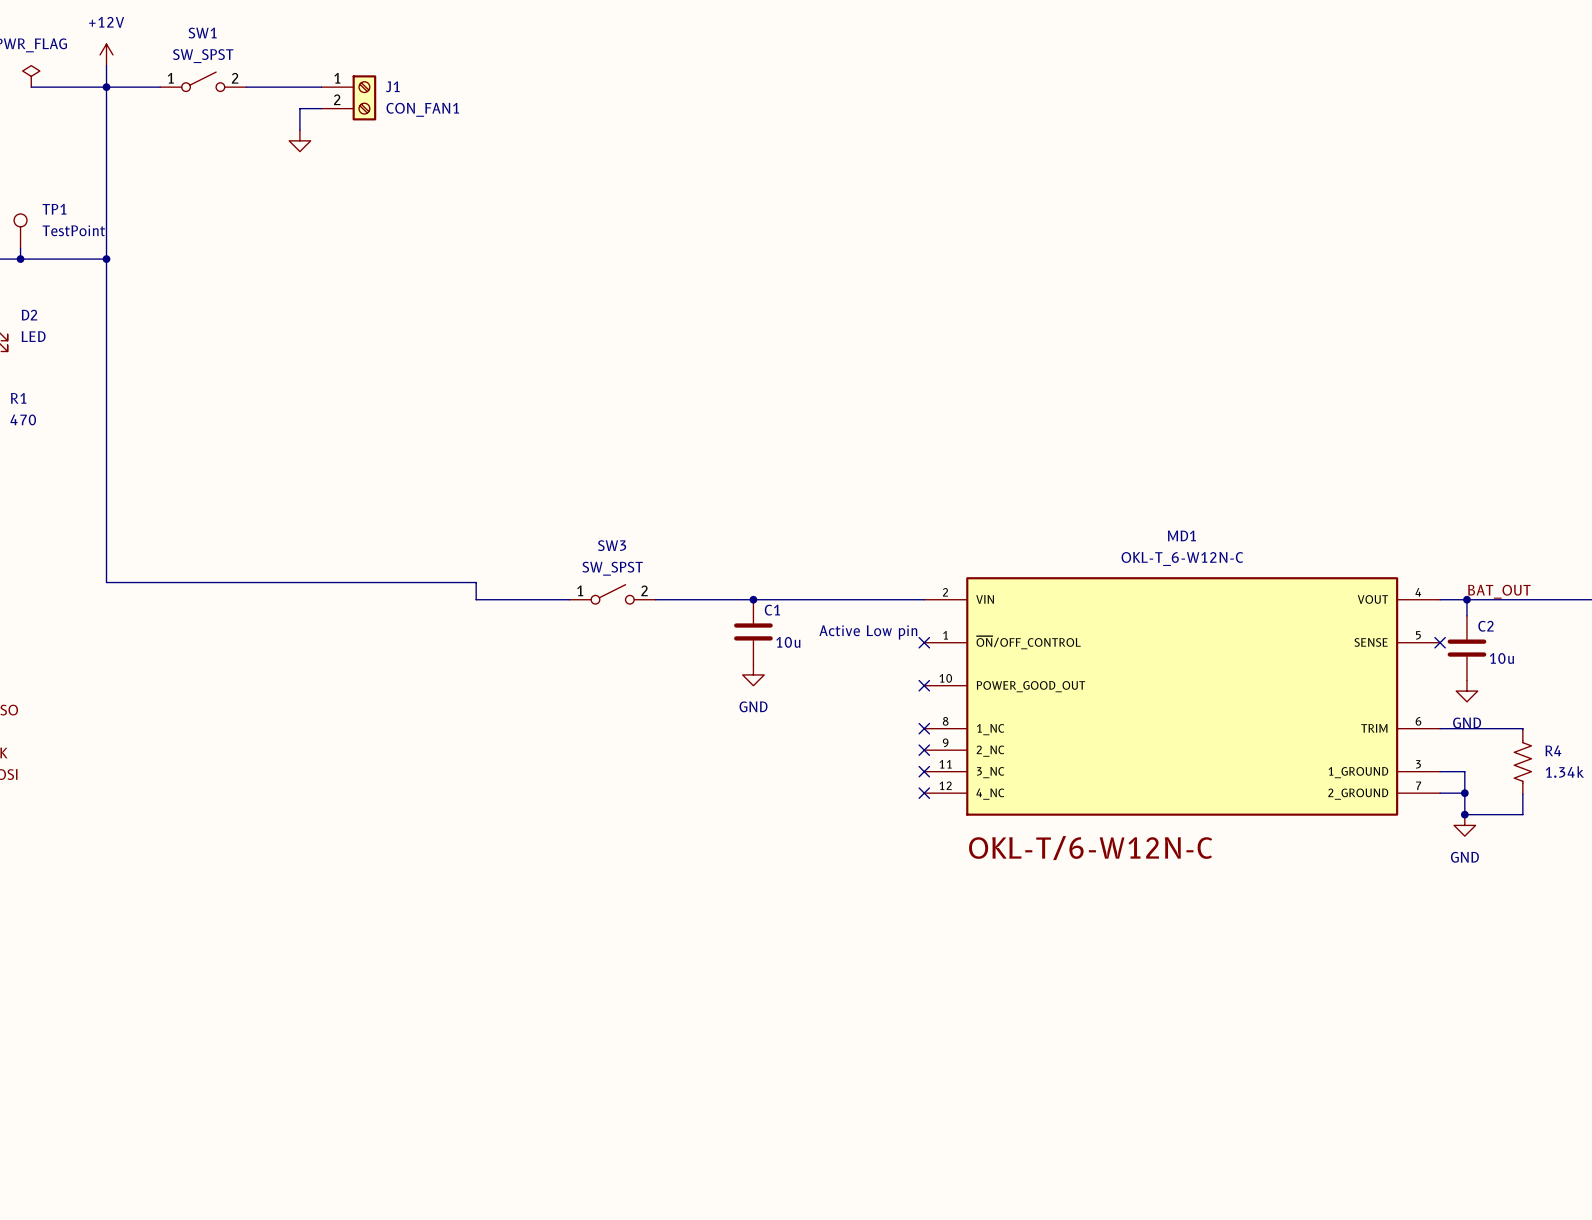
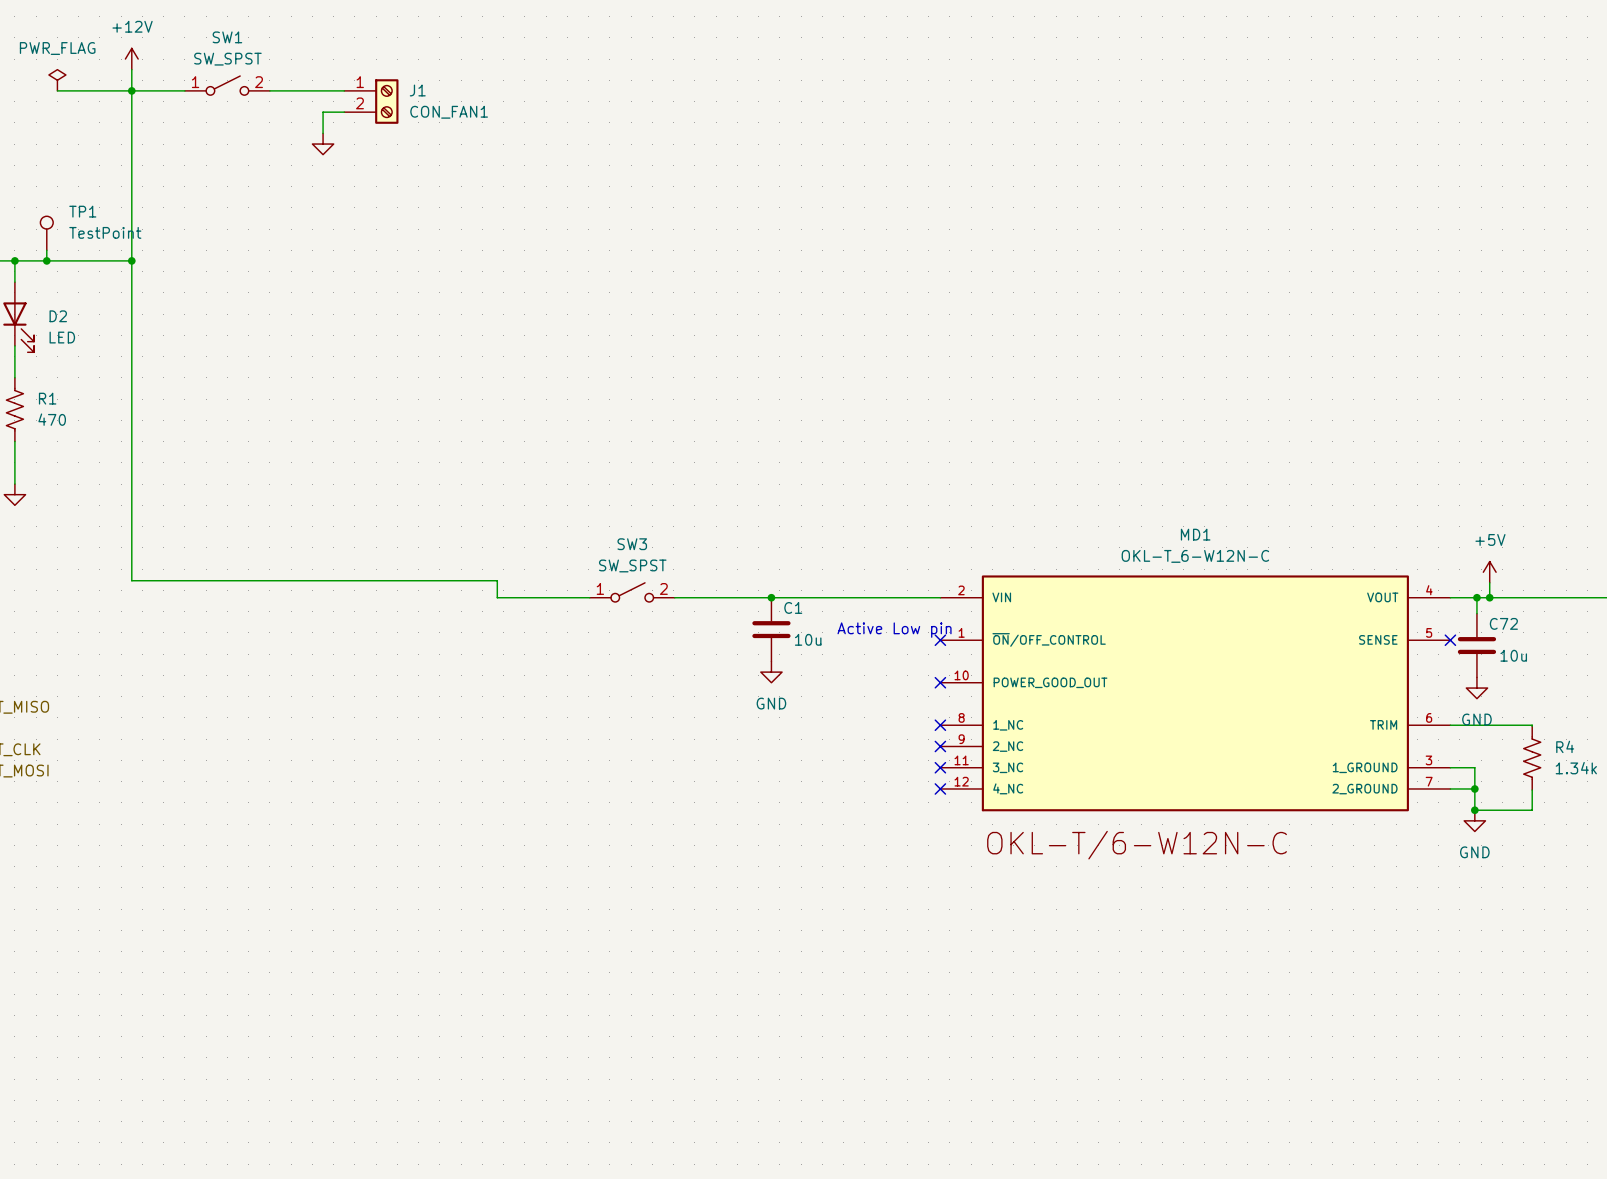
power symbol: none -> +5V (1489, 572)
wire: none -> (1489, 582) (1489, 597)
label: BAT_OUT (1499, 591) -> none
junction: none -> (1489, 597)
C2 name: C2 (1486, 626) -> C72 (1503, 623)

